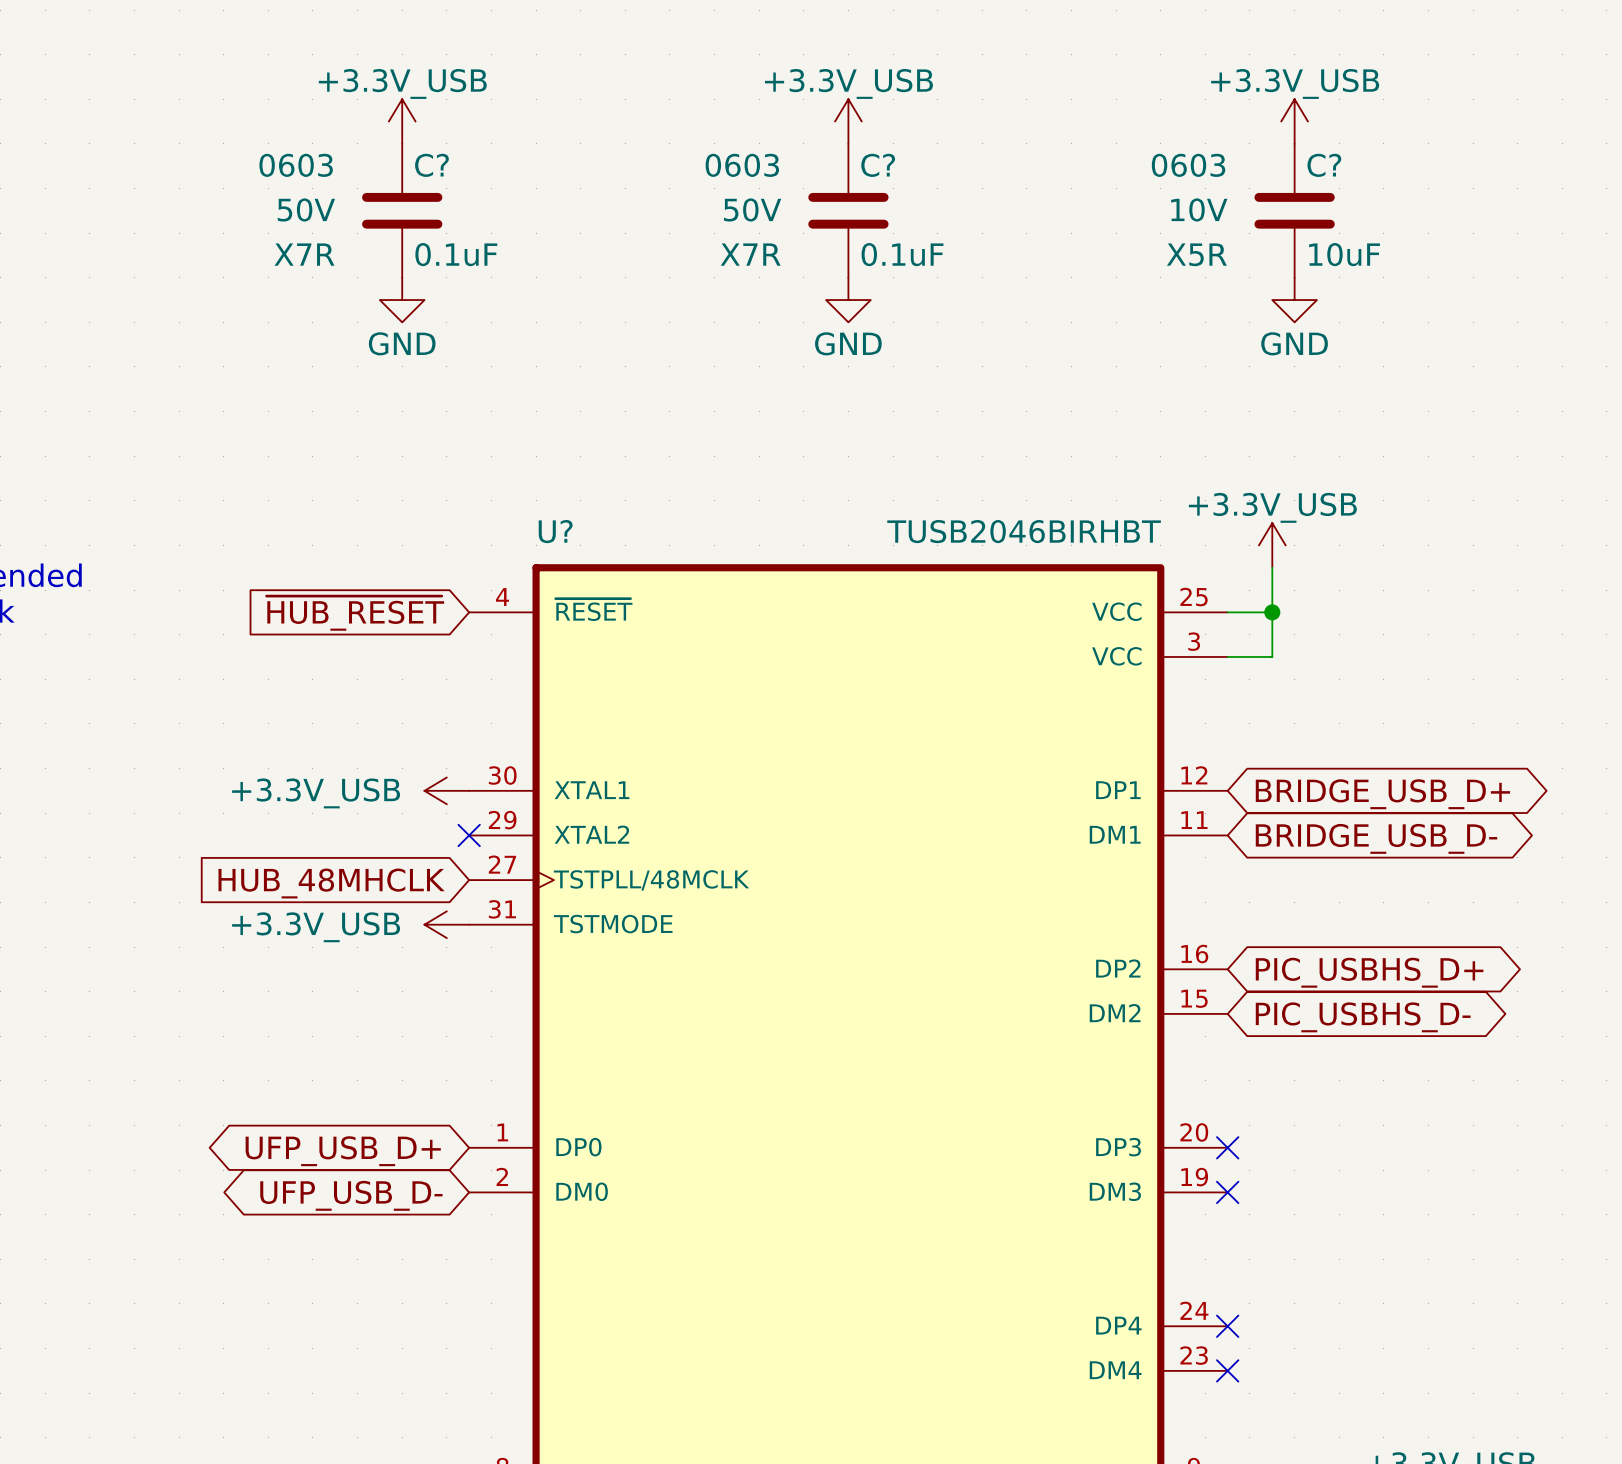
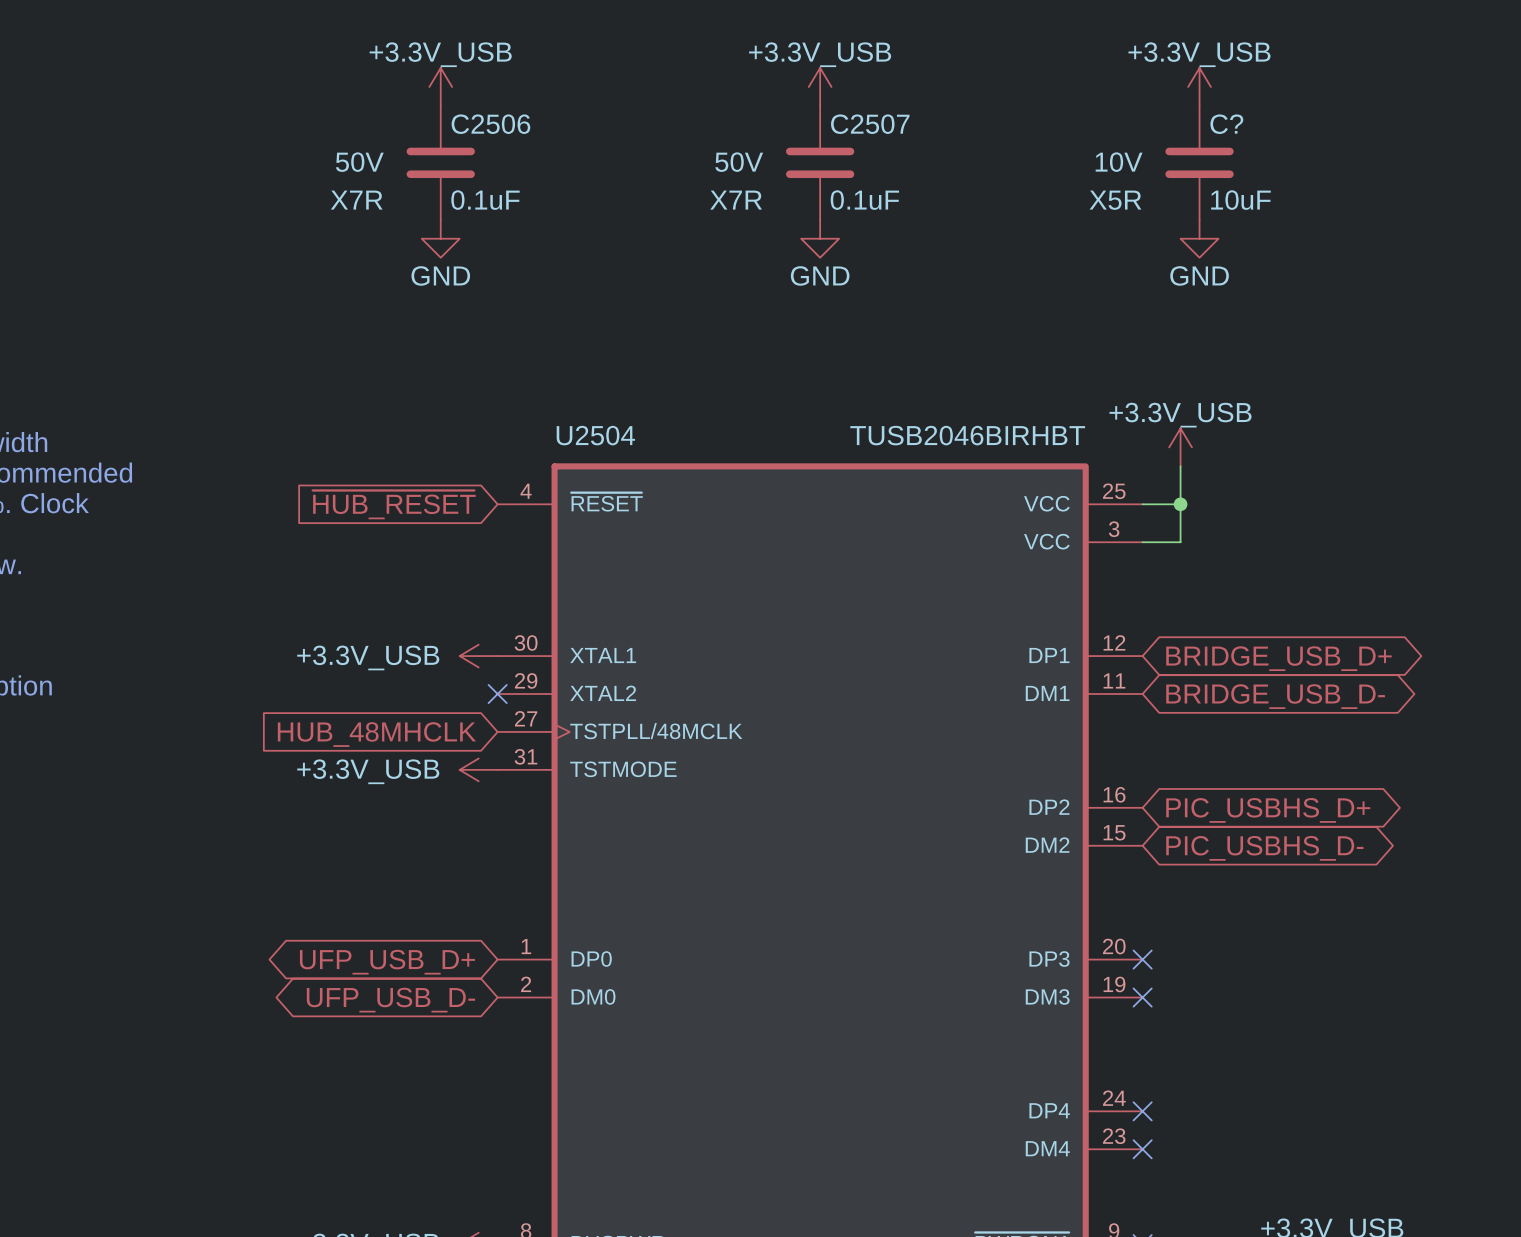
C? text: 0603 (296, 165) -> none
C? name: C? (431, 165) -> C2506 (490, 124)
C? text: 0603 (742, 165) -> none
C? name: C? (878, 165) -> C2507 (870, 124)
C? text: 0603 (1188, 165) -> none
U? name: U? (555, 531) -> U2504 (595, 435)

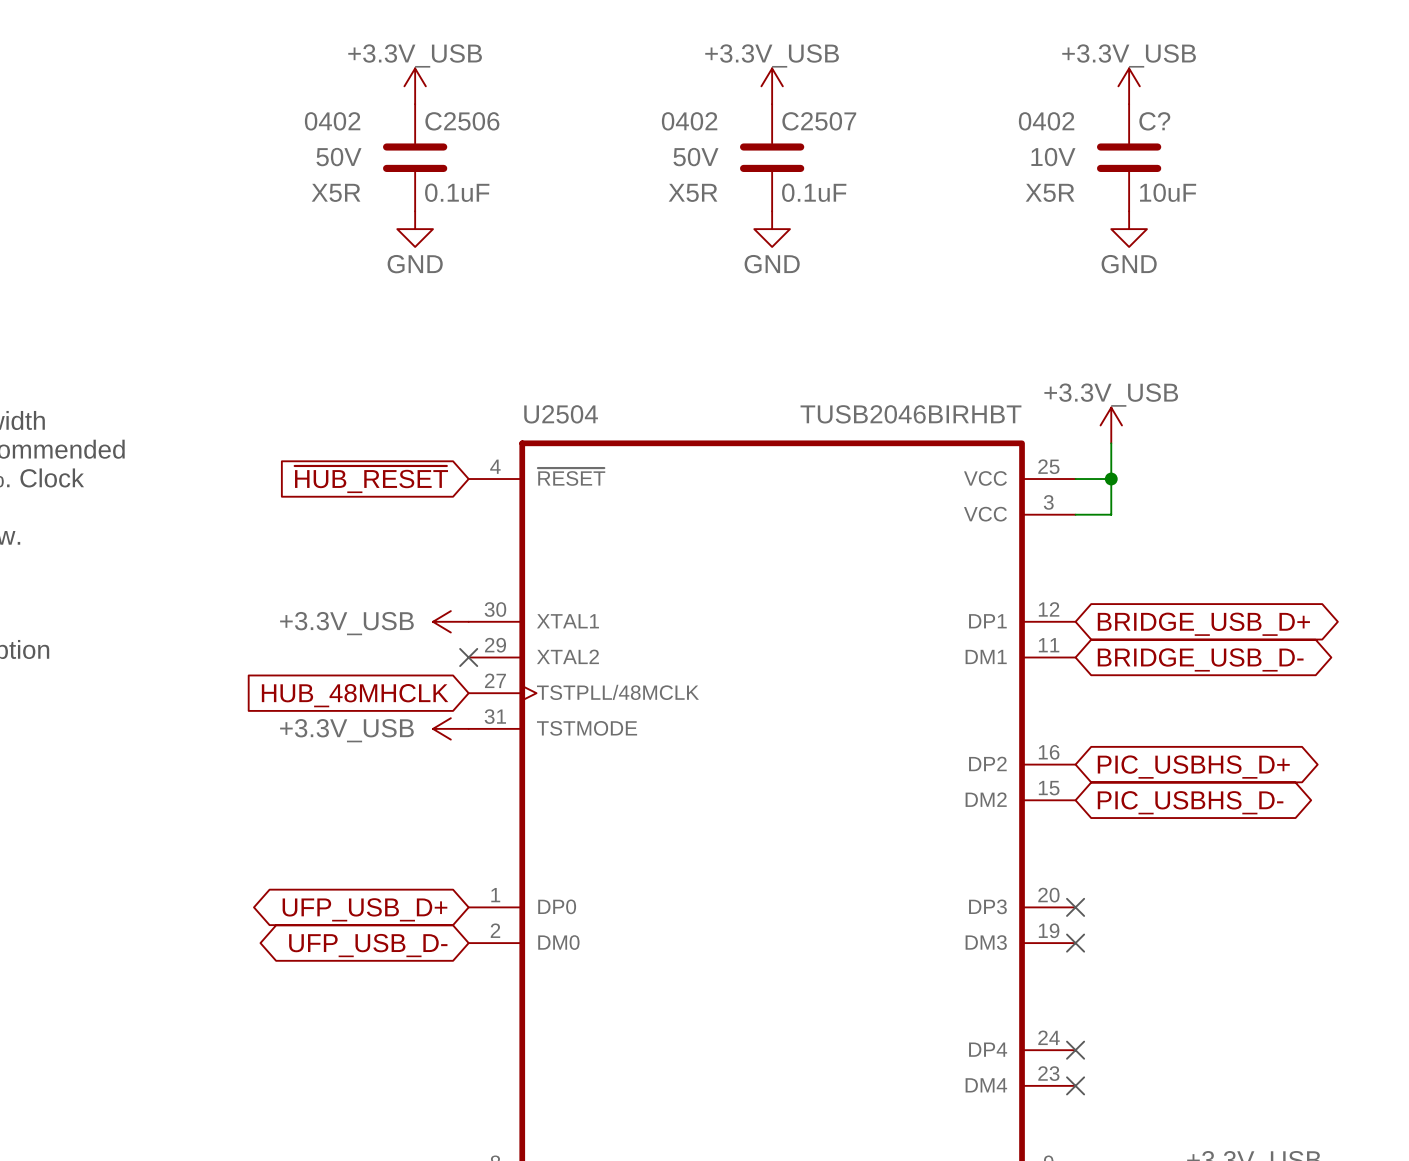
C2506 text: none -> 0402 (332, 121)
C2507 text: none -> 0402 (689, 121)
C? text: none -> 0402 (1046, 121)
C2506 text: X7R (356, 200) -> X5R (336, 192)
C2507 text: X7R (736, 200) -> X5R (693, 192)

